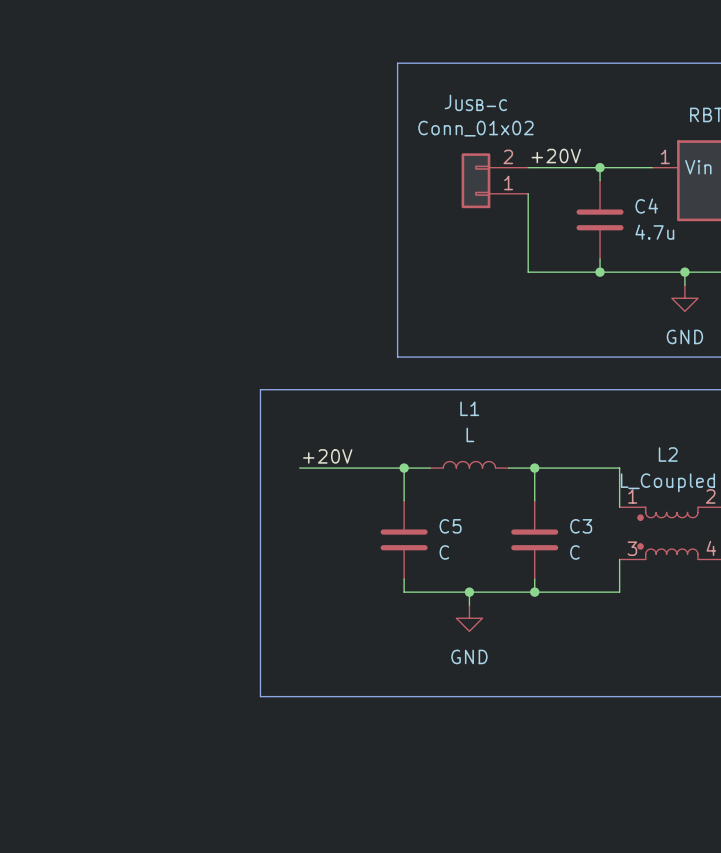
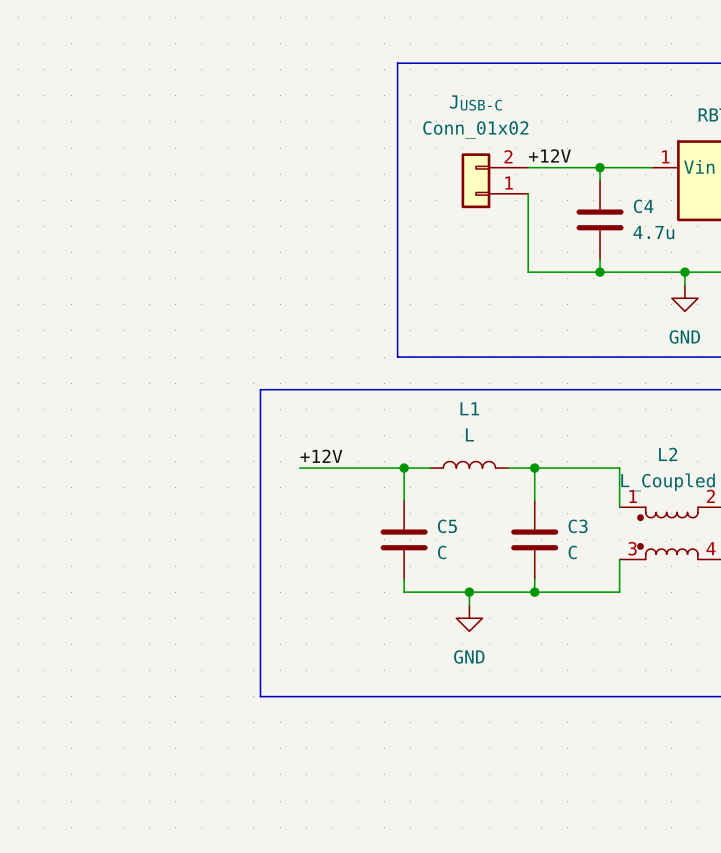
label: +20V (556, 156) -> +12V (549, 155)
label: +20V (327, 456) -> +12V (321, 456)

